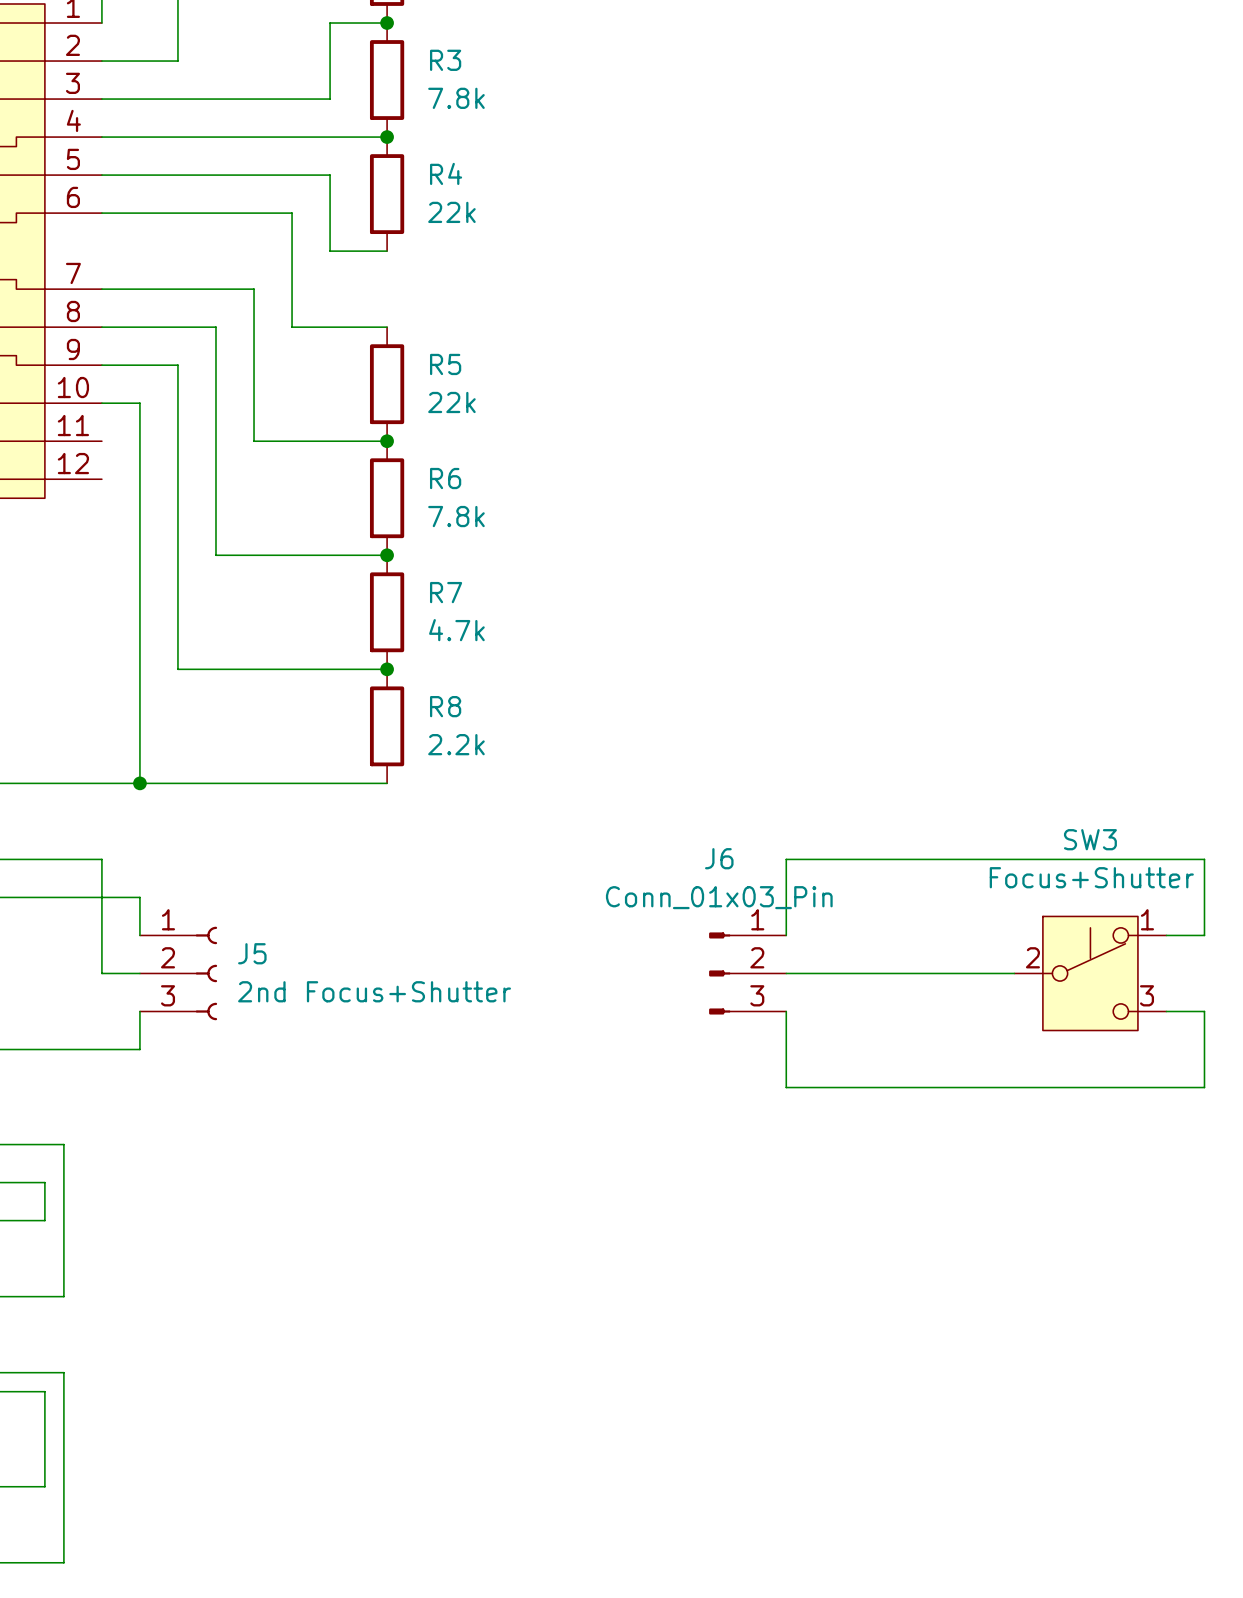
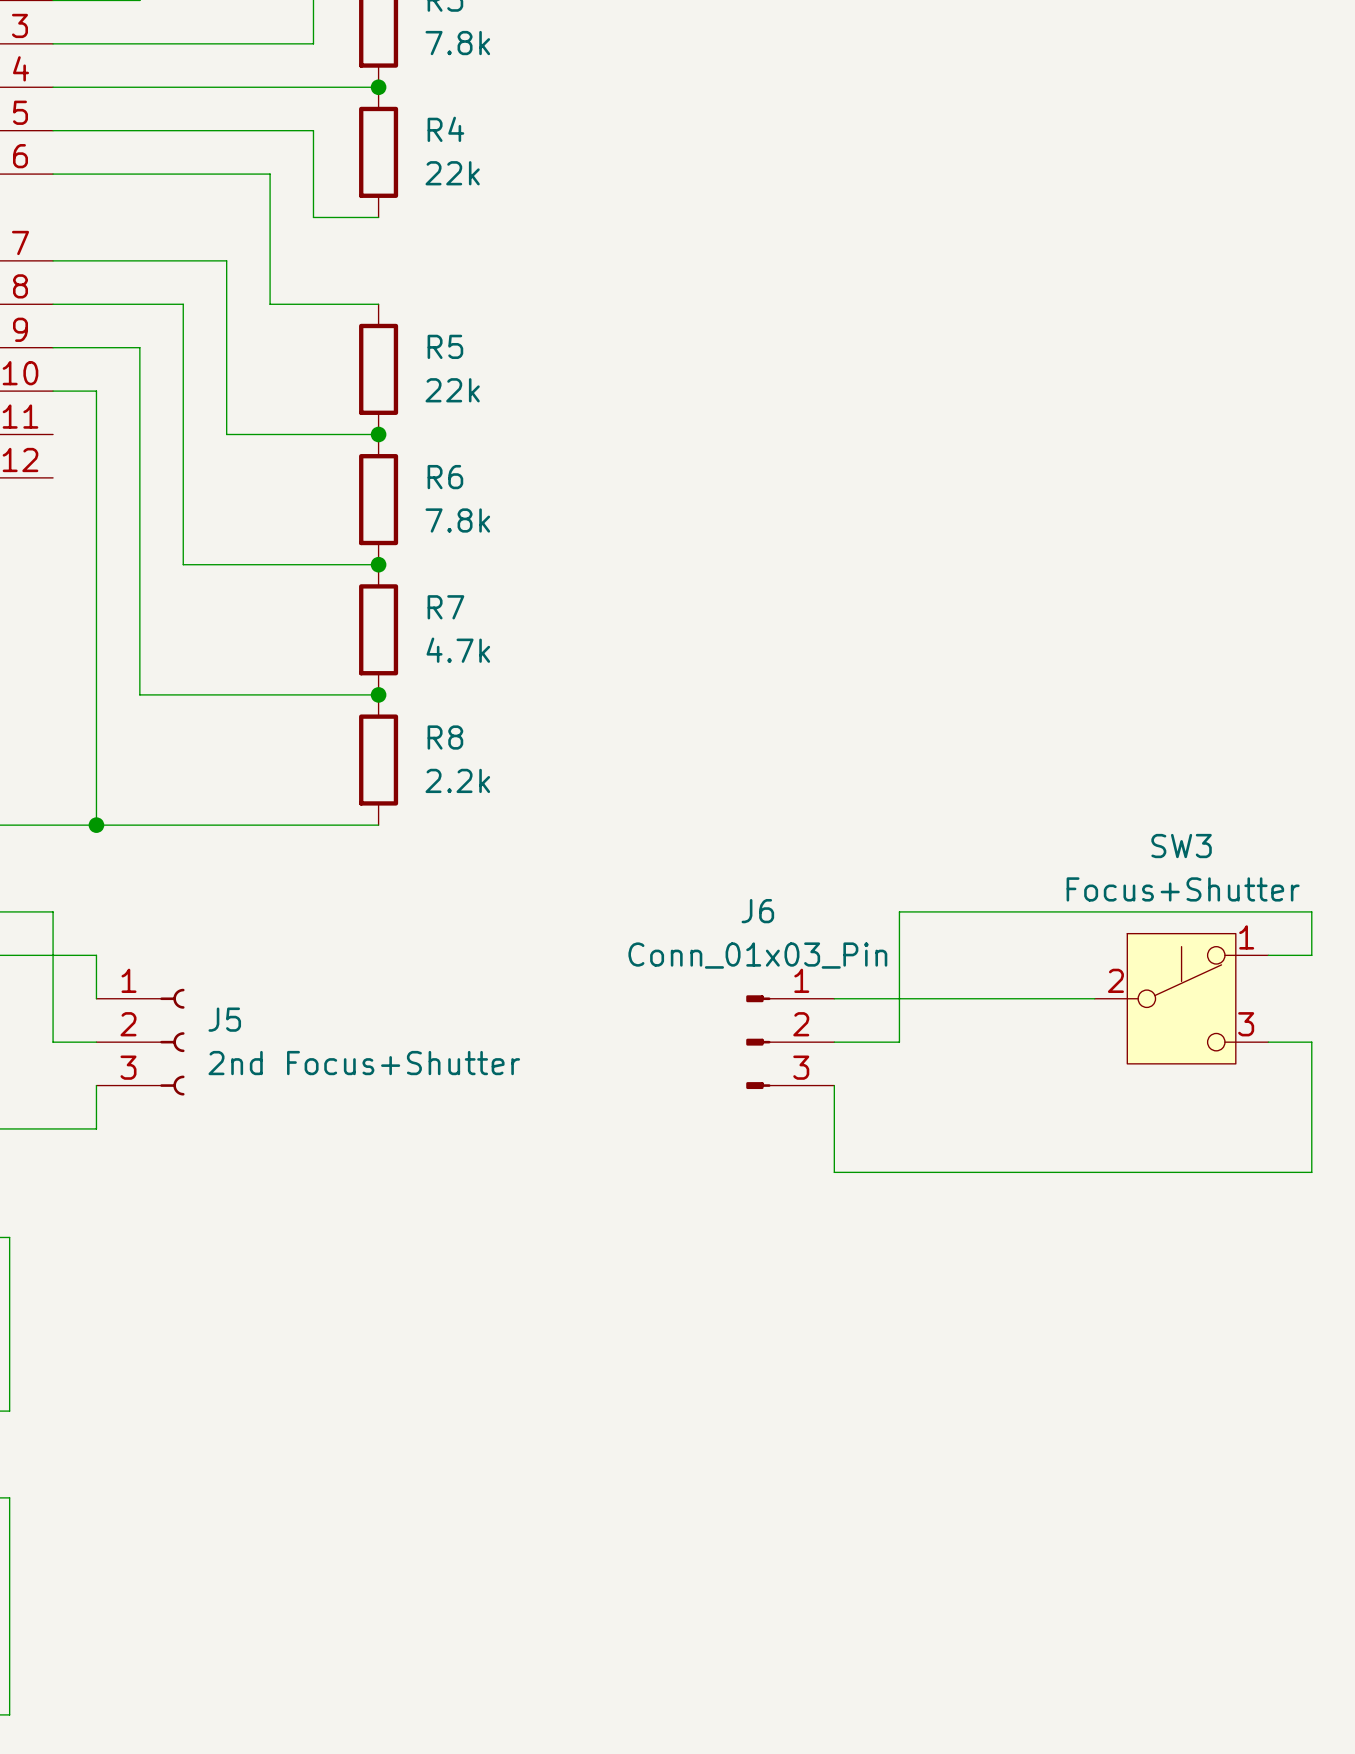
wire: (843, 859) (786, 859) (786, 935) -> (899, 911) (899, 1042)
wire: (1204, 897) (1204, 935) (1166, 935) -> (1311, 955) (1268, 955)
wire: none -> (834, 998) (1094, 998)
wire: (843, 973) (1014, 973) -> none
SW3 position: (1090, 973) -> (1181, 998)
wire: (1166, 1011) (1204, 1011) -> (1268, 1042) (1311, 1042) (1311, 1085)

